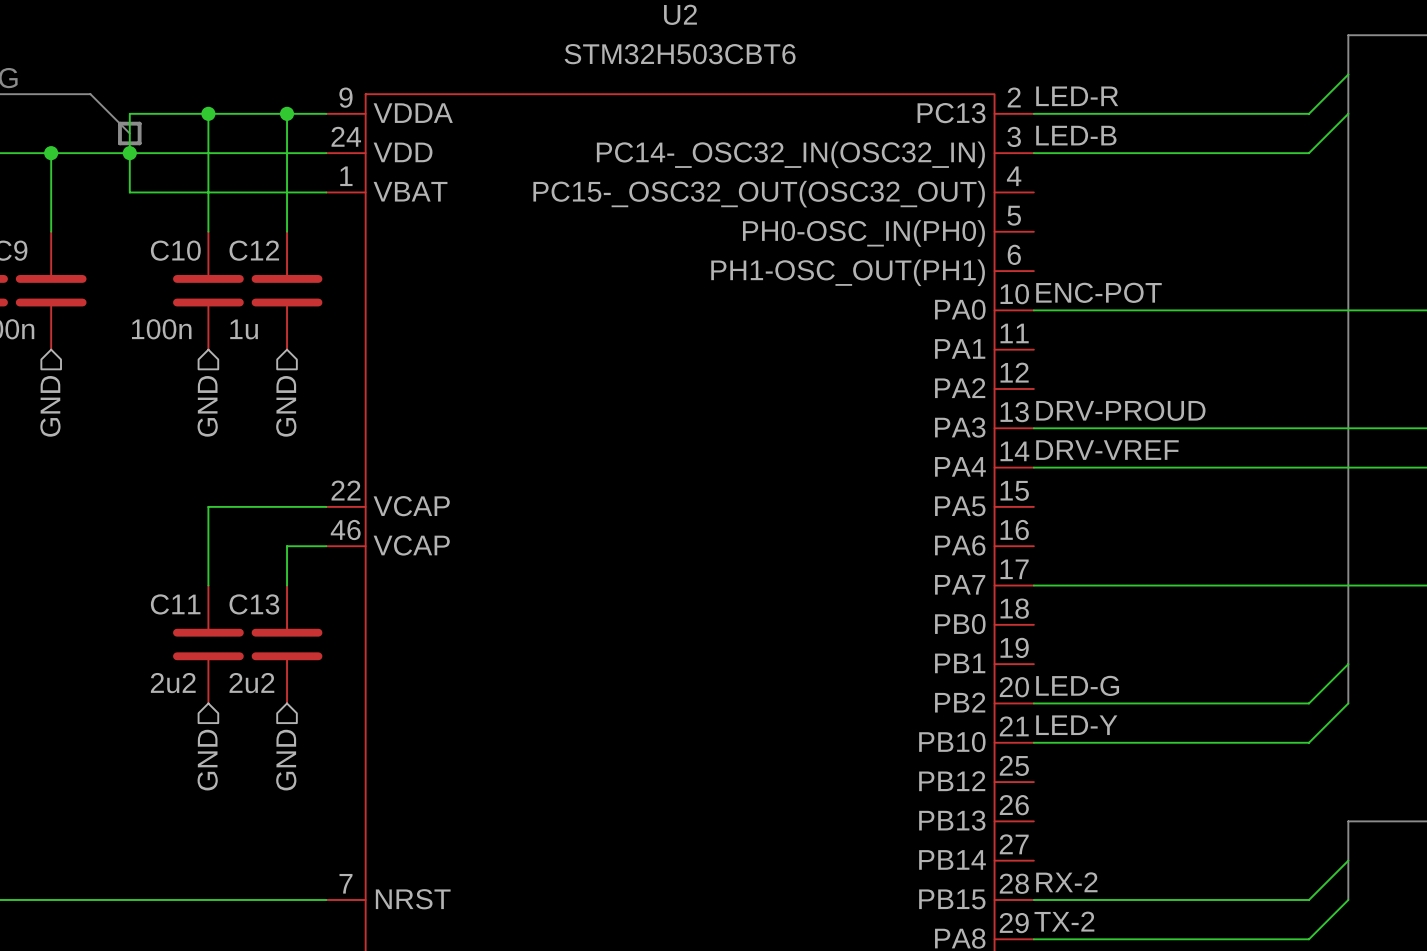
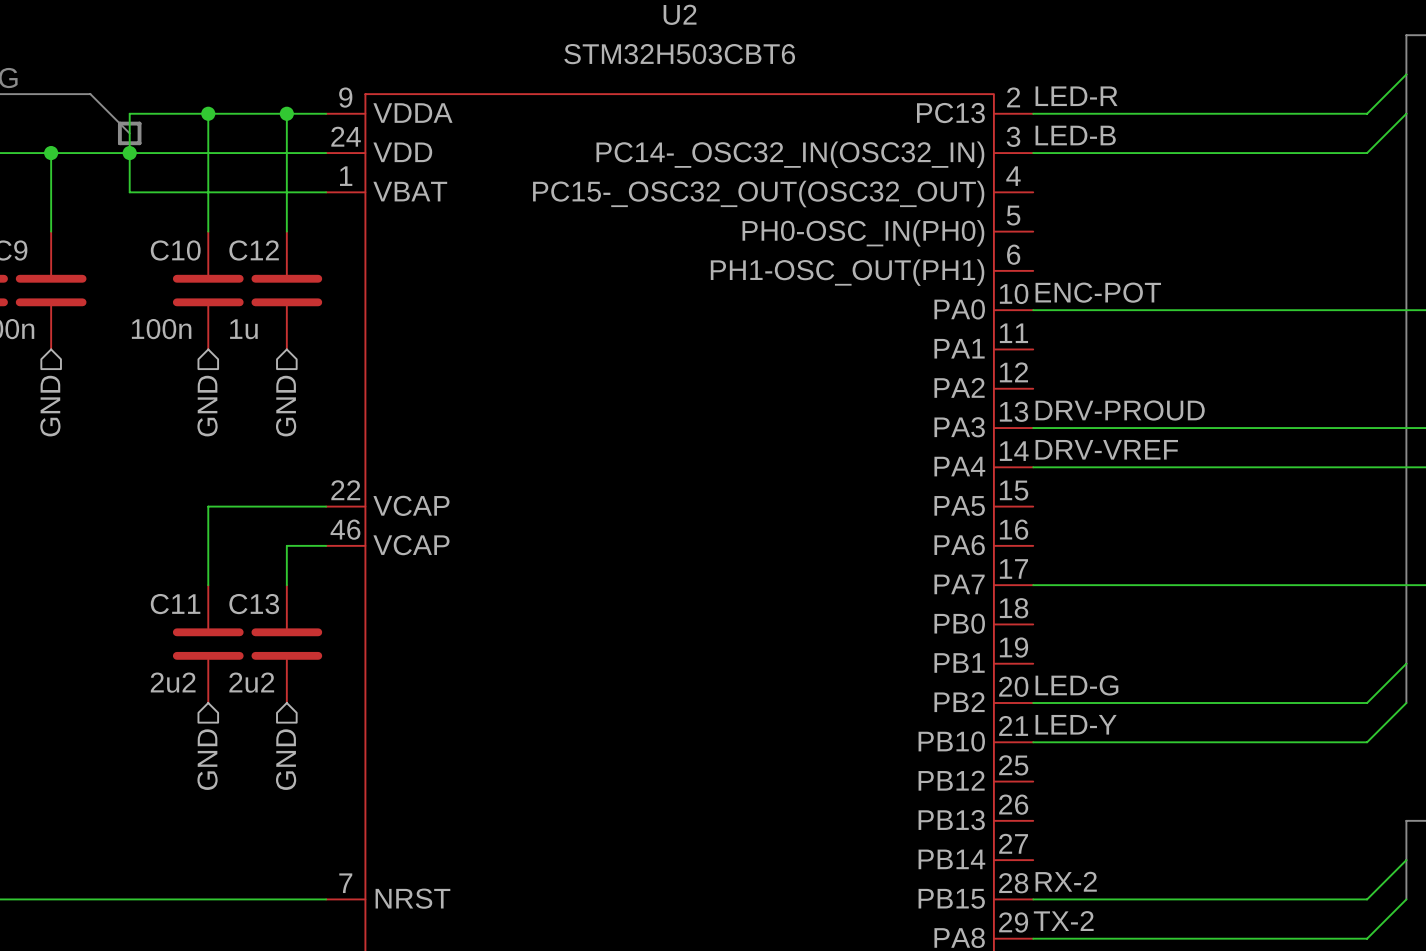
bus: (1407, 35) (1348, 35) (1348, 703) -> (1406, 35) (1406, 703)
wire: (1348, 74) (1309, 113) -> (1406, 74) (1367, 113) (1308, 113)
wire: (1348, 113) (1309, 153) -> (1406, 113) (1367, 153) (1308, 153)
wire: (1348, 664) (1309, 703) -> (1406, 663) (1367, 703) (1308, 703)
wire: (1348, 703) (1309, 742) -> (1406, 703) (1367, 742) (1308, 742)
bus: (1407, 821) (1348, 821) (1348, 899) -> (1406, 820) (1406, 899)
wire: (1348, 860) (1309, 899) -> (1406, 860) (1367, 899) (1308, 899)
wire: (1348, 899) (1309, 939) -> (1406, 899) (1367, 938) (1308, 938)

